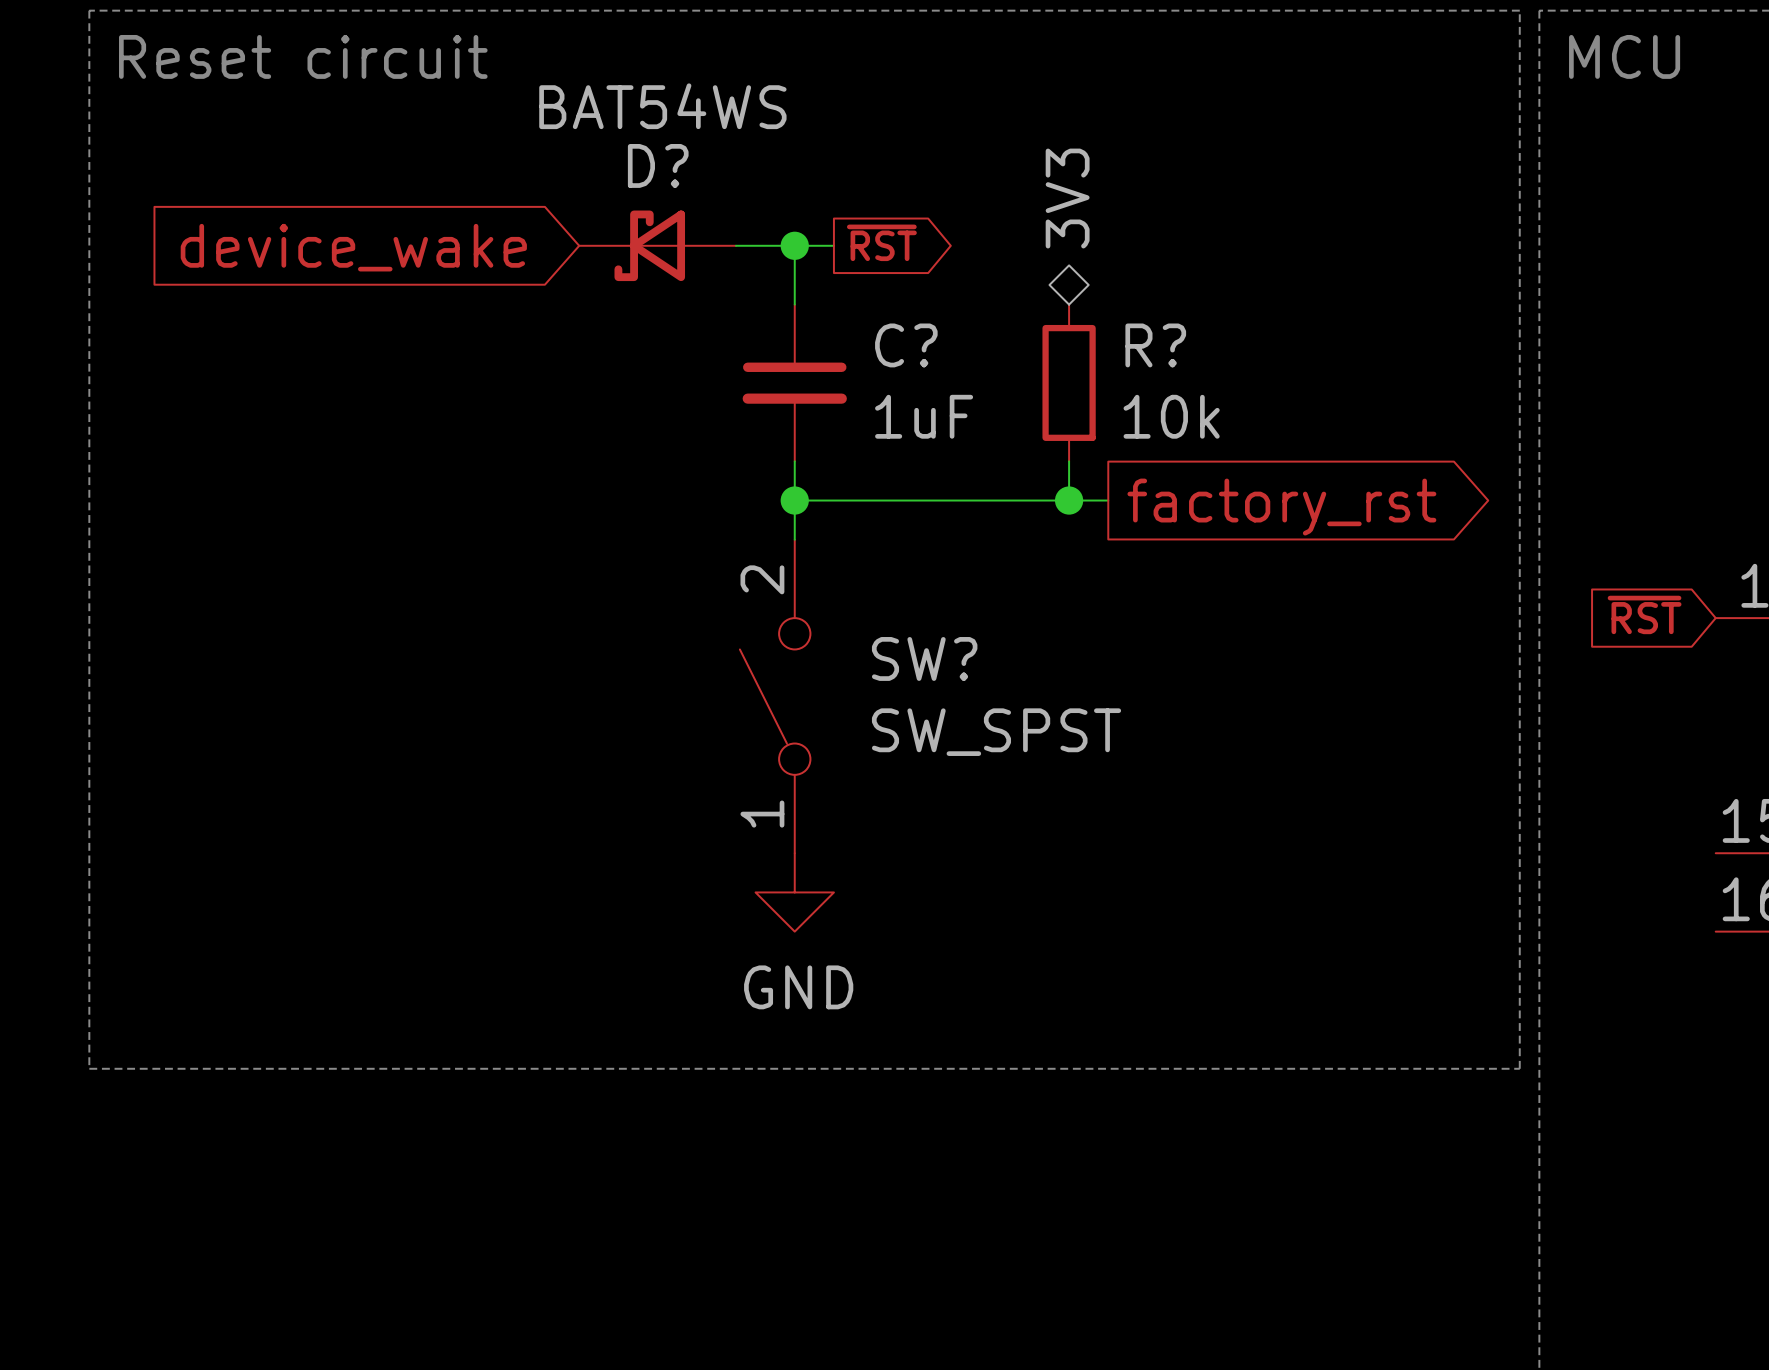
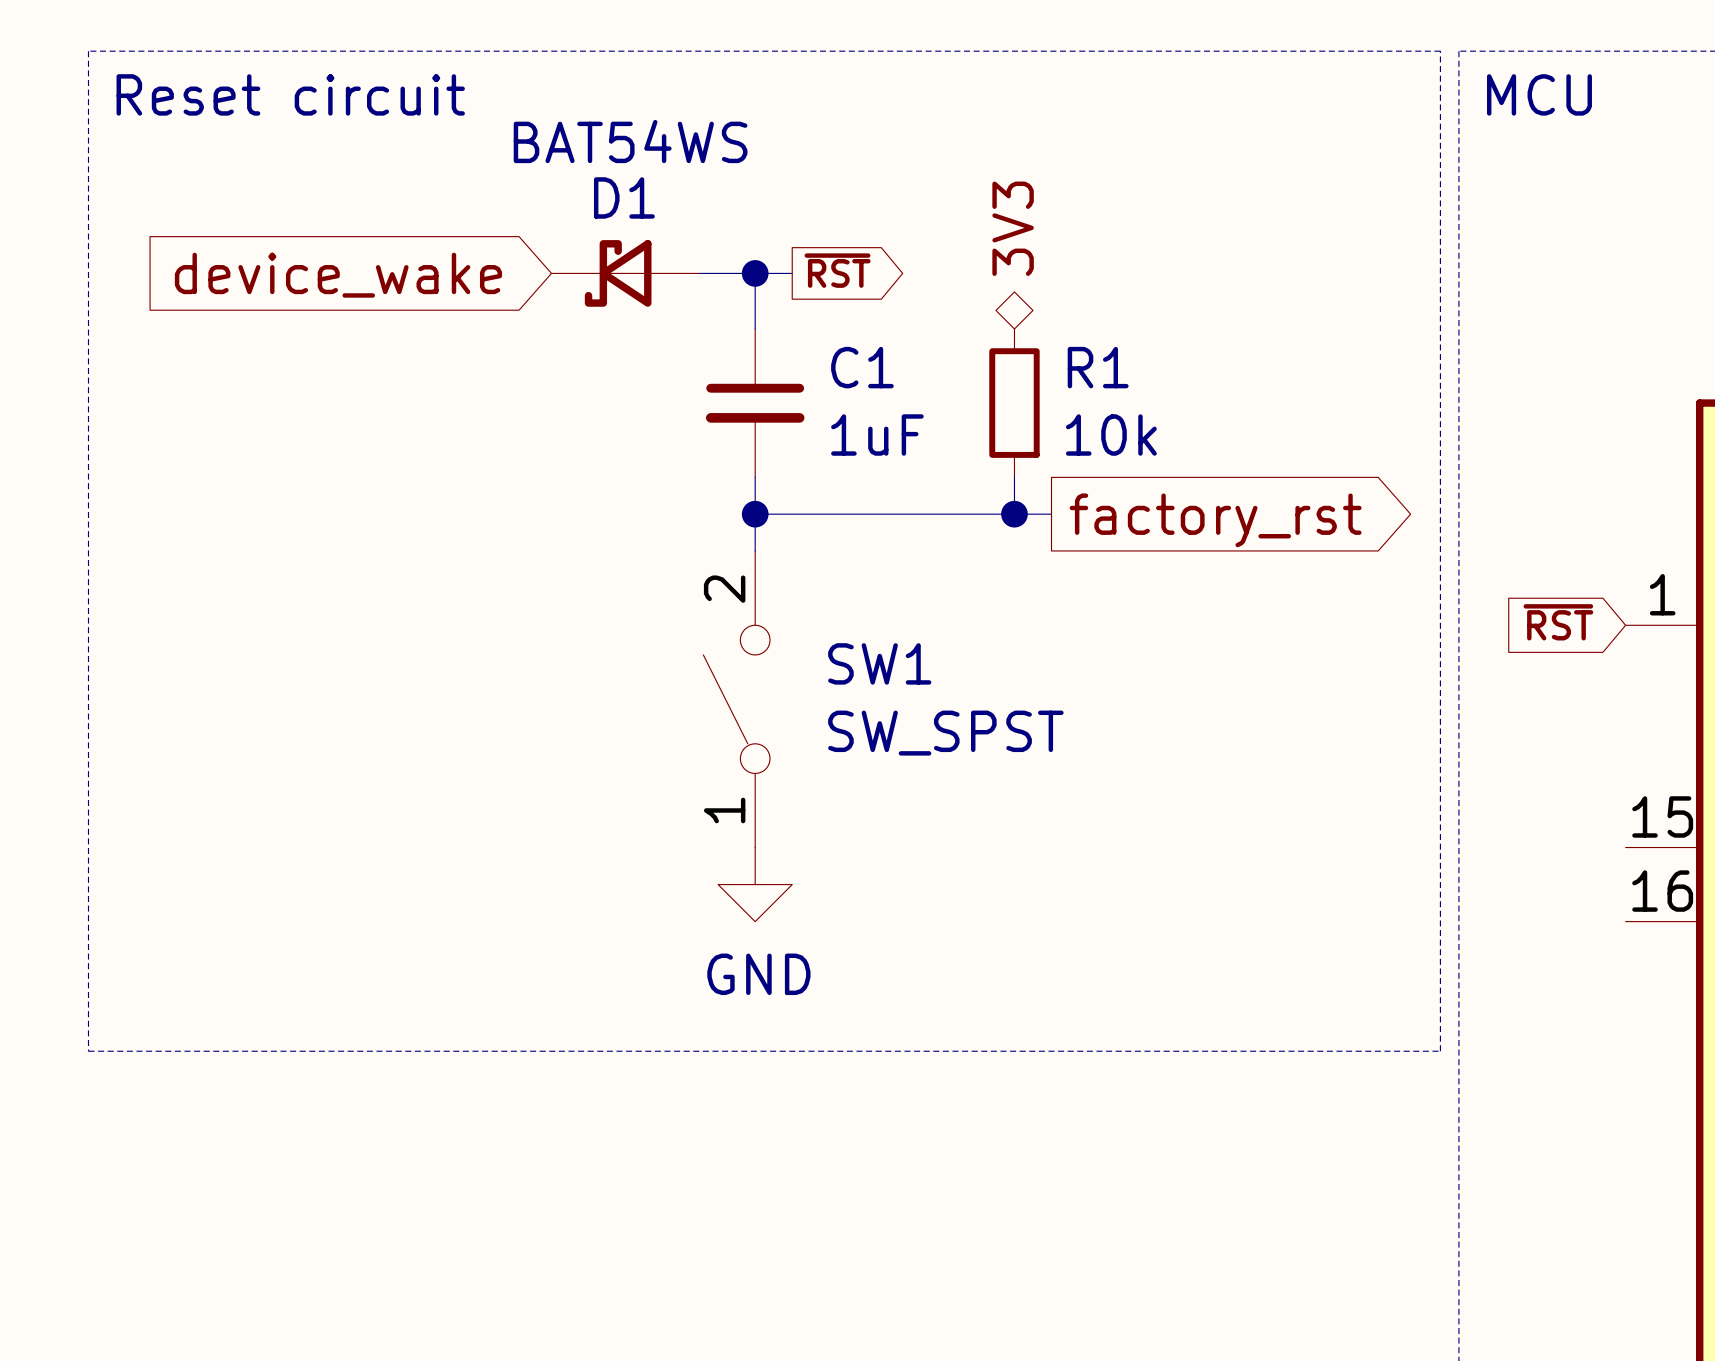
D? name: D? (658, 165) -> D1 (624, 197)
C? name: C? (906, 345) -> C1 (862, 367)
R? name: R? (1155, 345) -> R1 (1098, 367)
SW? name: SW? (924, 658) -> SW1 (879, 663)

